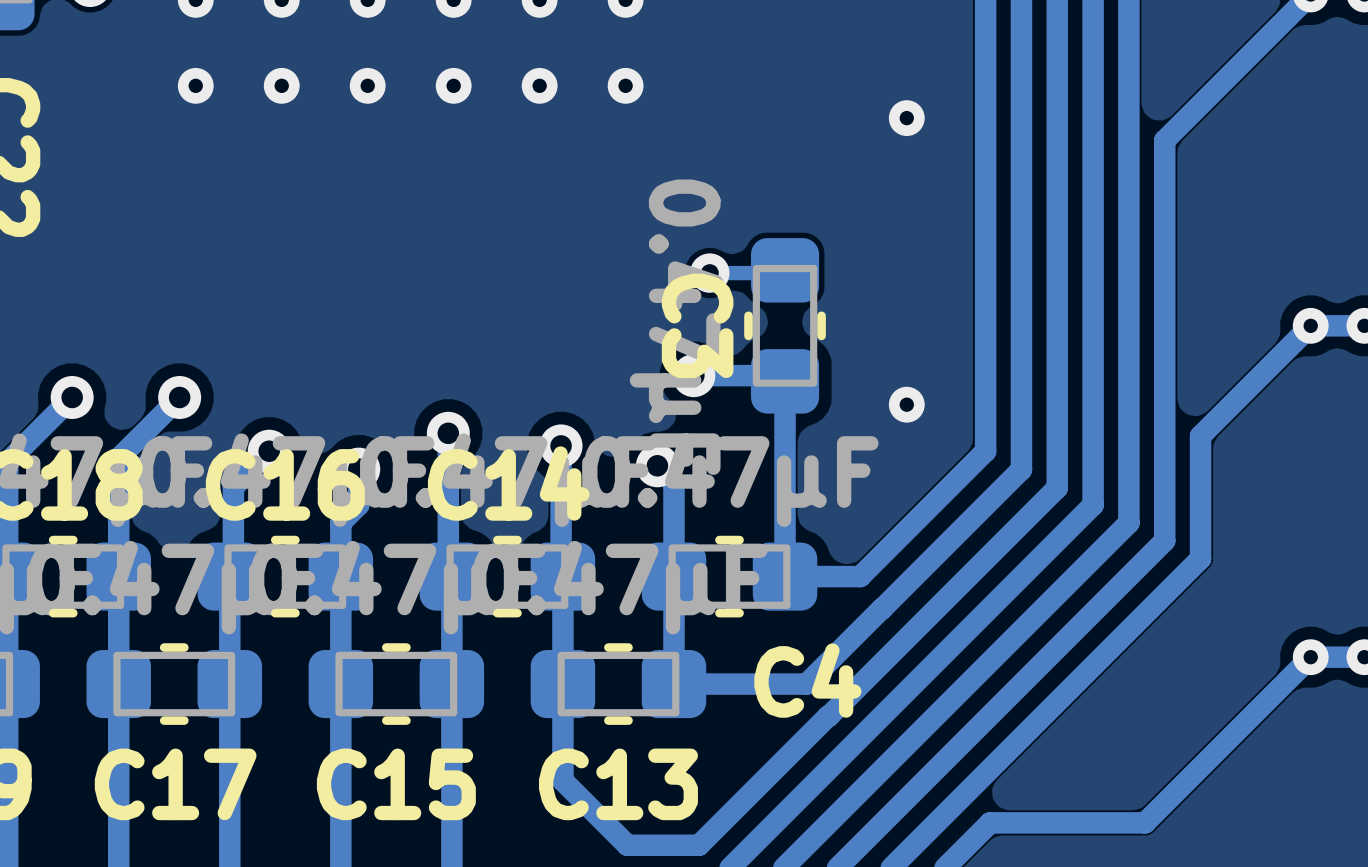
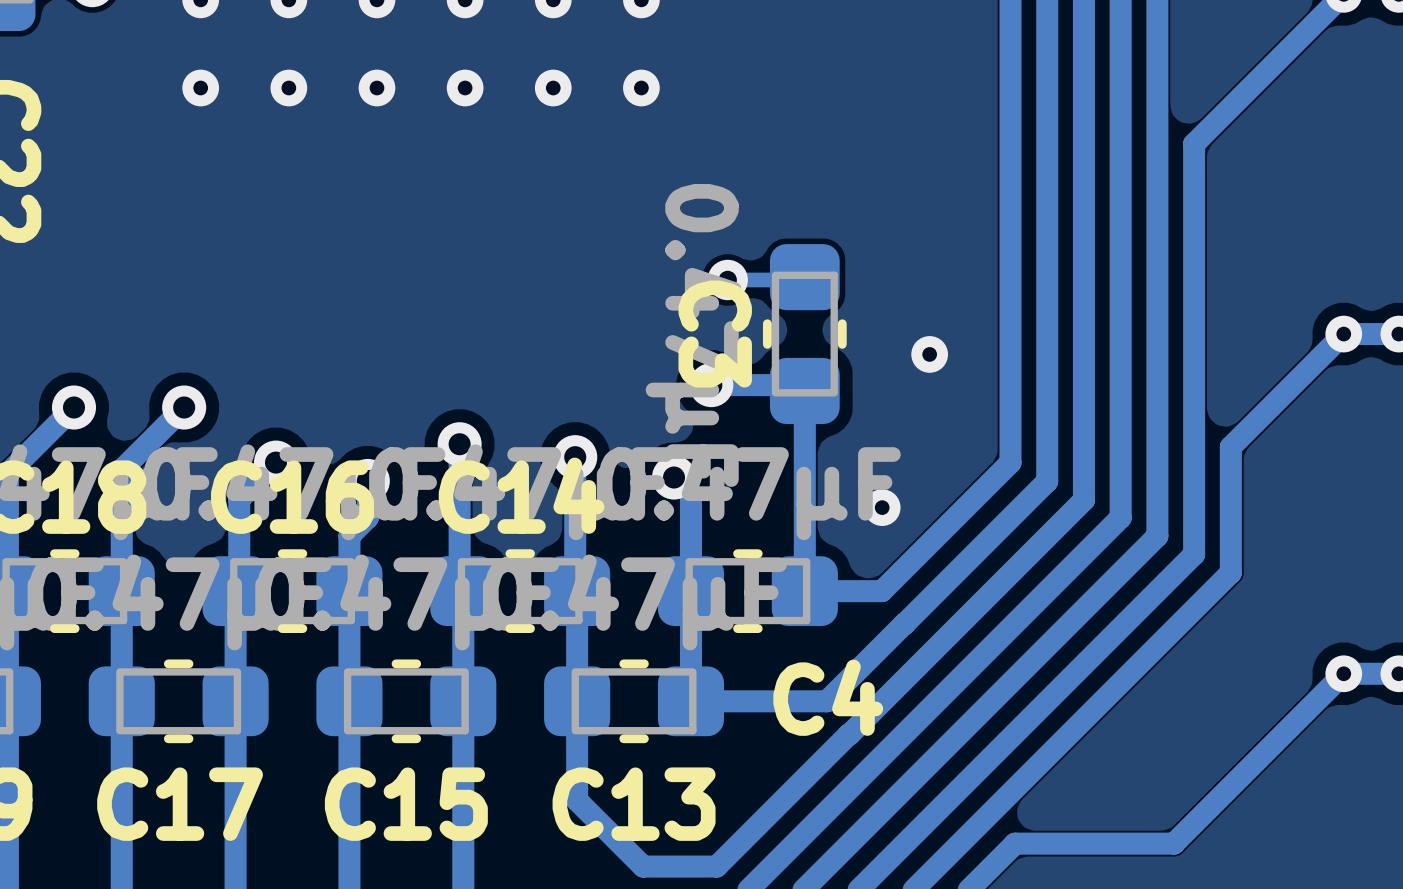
via: (906, 118) -> none
via: none -> (929, 354)
via: (906, 404) -> none
via: none -> (882, 507)

